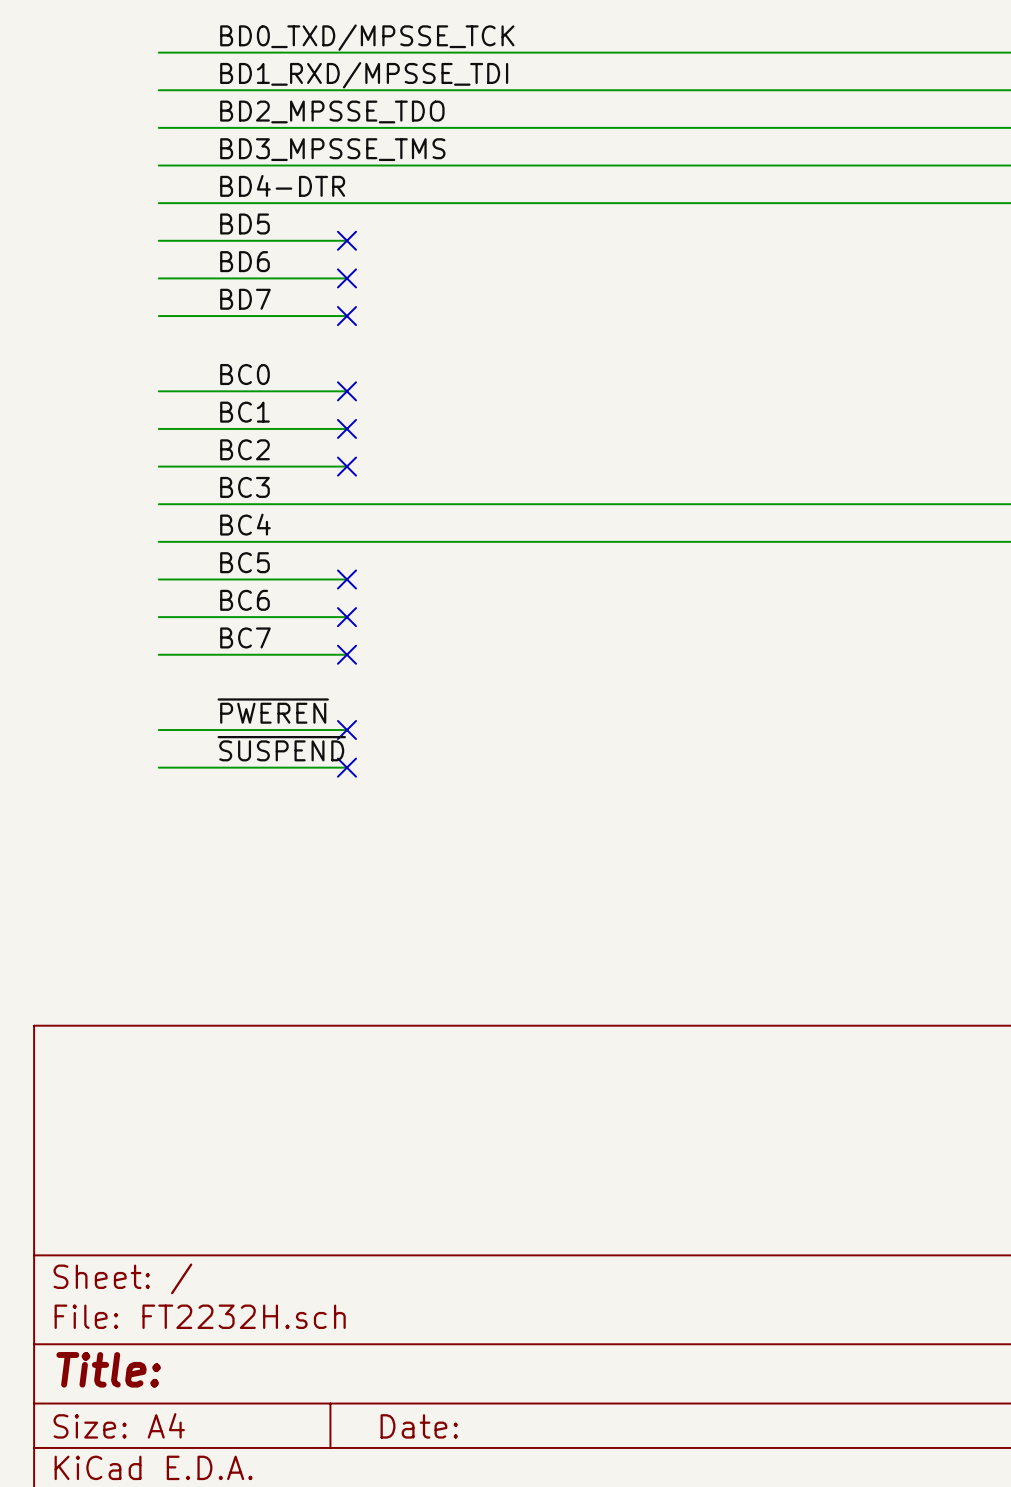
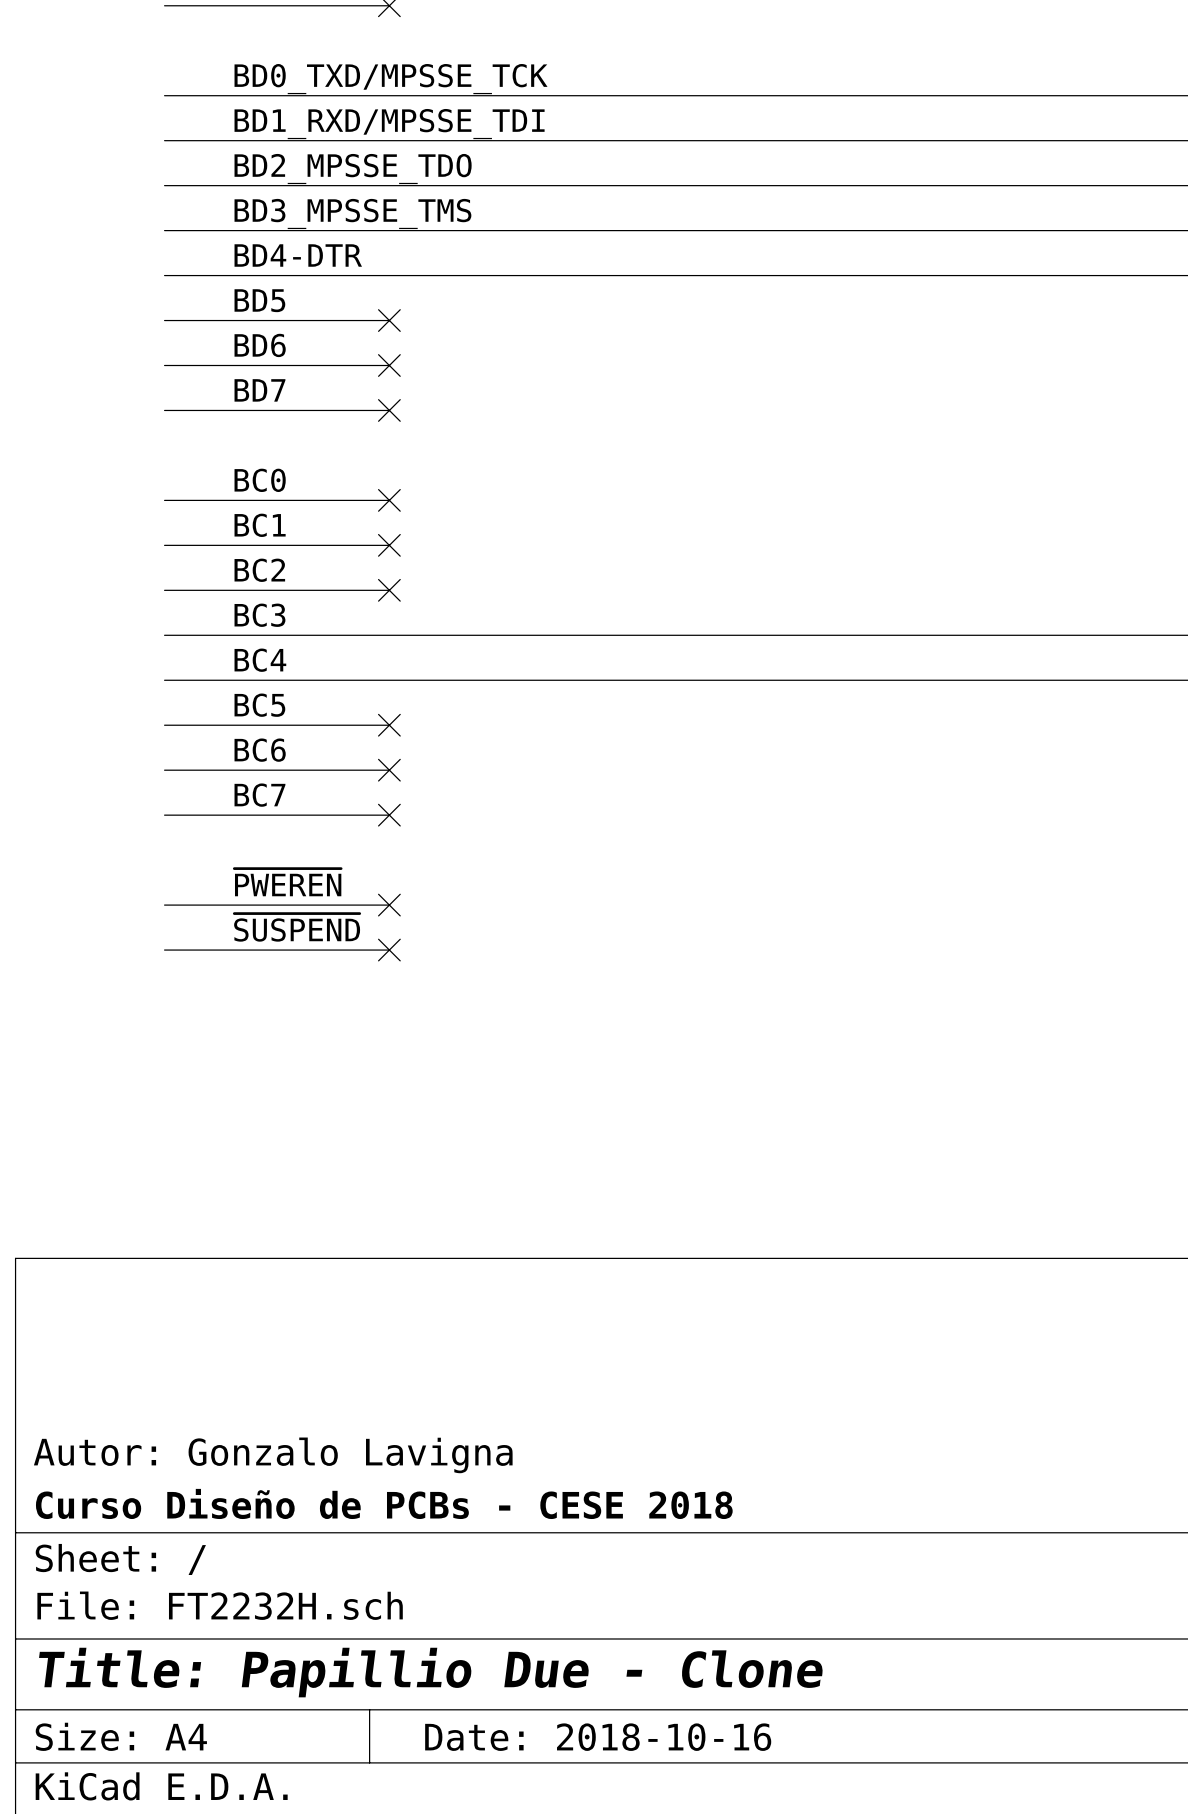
title block: none -> Autor: Gonzalo Lavigna (273, 1455)
title block: none -> Curso Diseño de PCBs - CESE 2018 (384, 1503)
title block: Title: (108, 1369) -> Title: Papillio Due - Clone (431, 1672)
title block: Date: (419, 1426) -> Date: 2018-10-16 (598, 1737)

